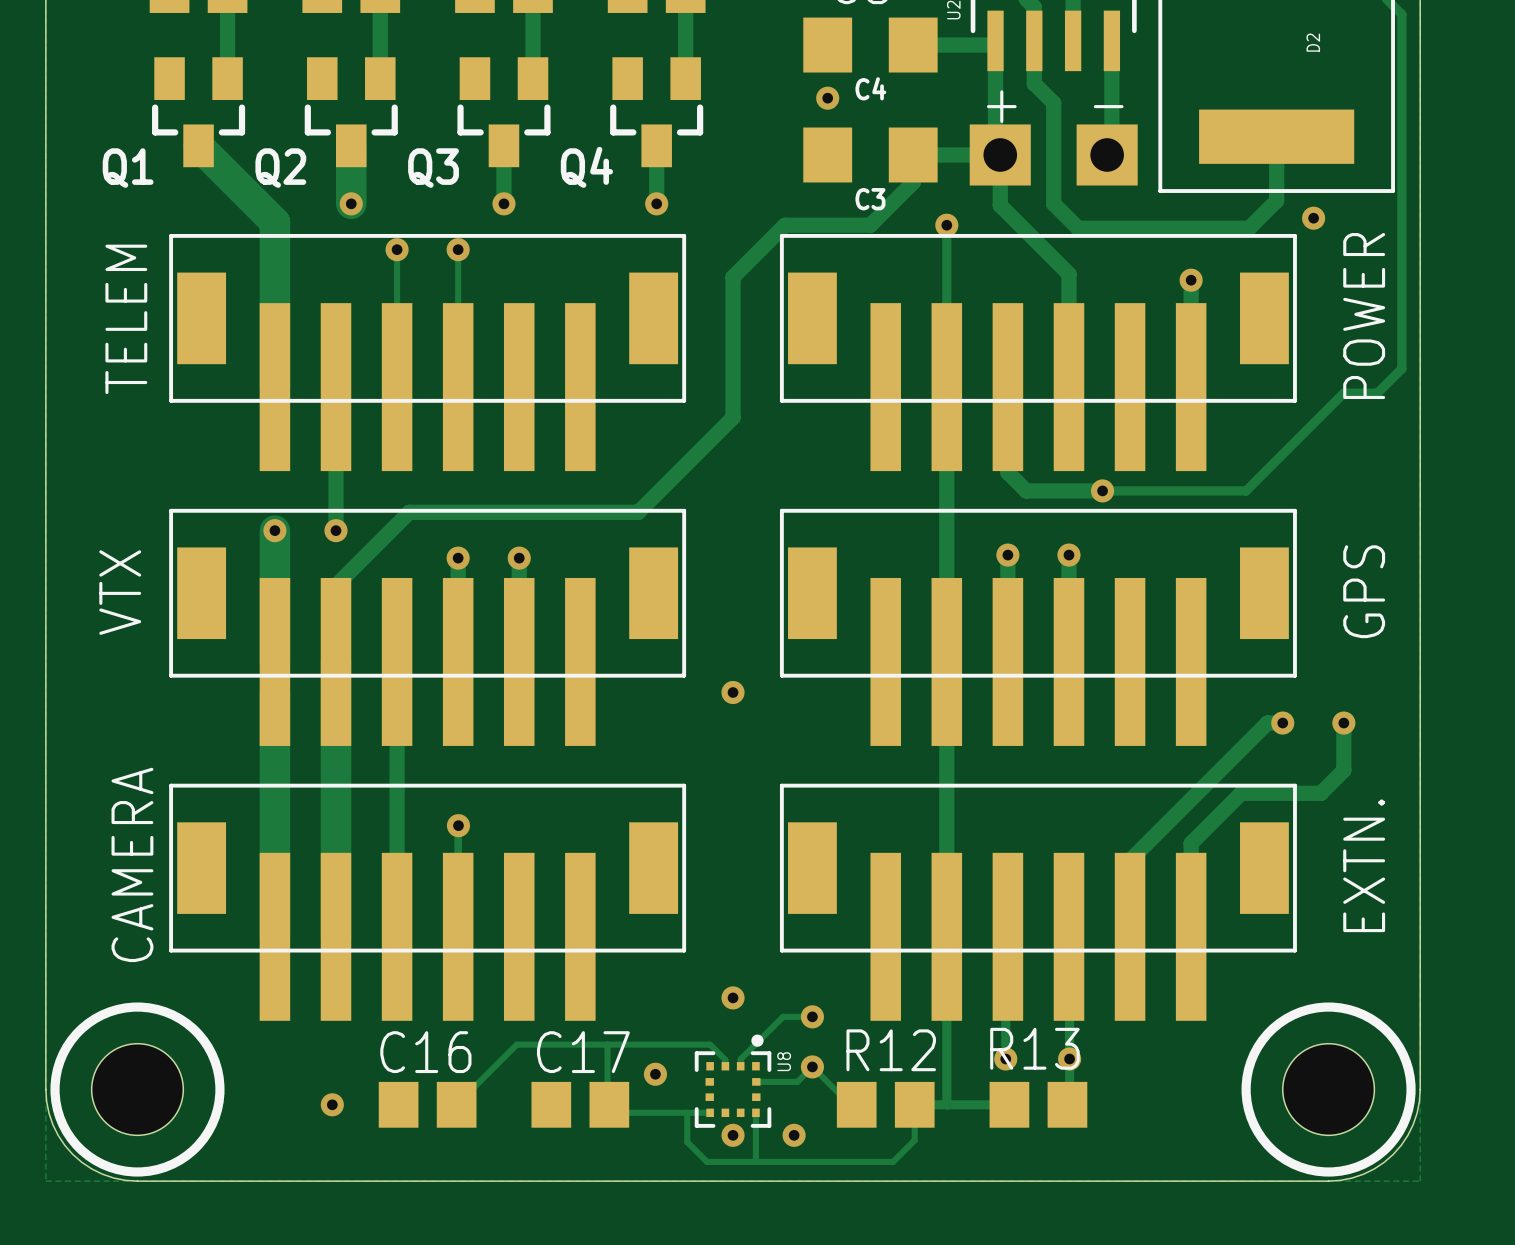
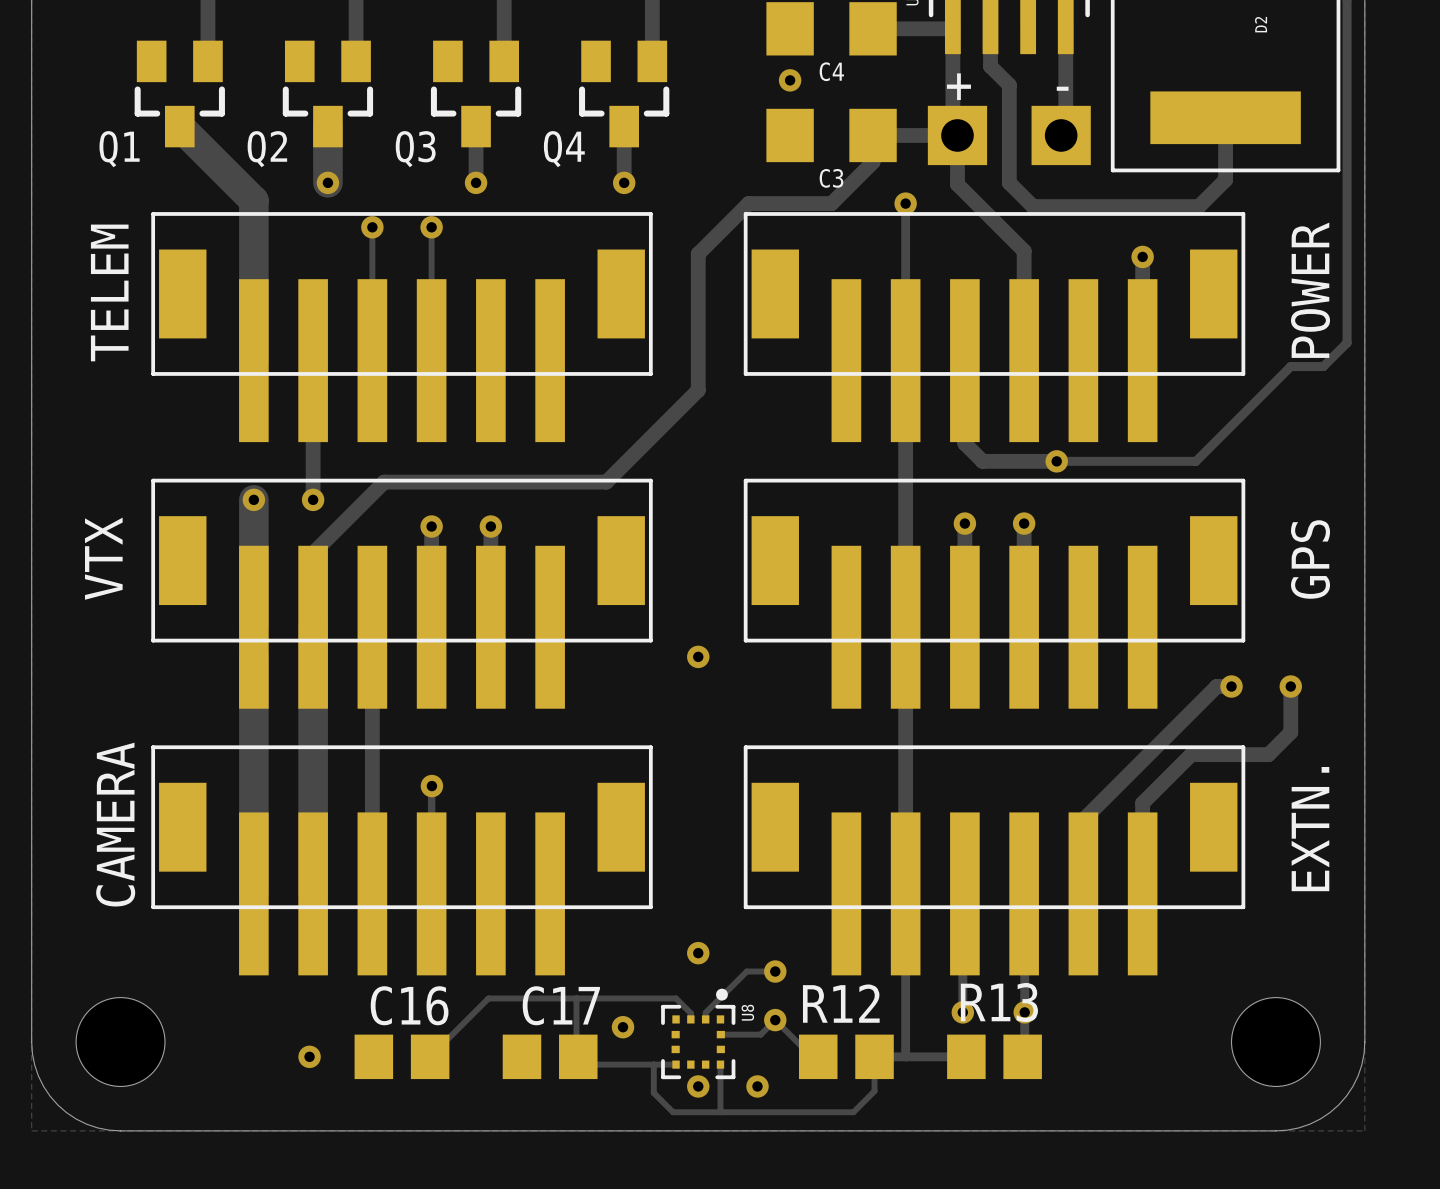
via: (1313, 218) -> none
drawing: [50, 1002, 225, 1177] -> none
drawing: [1241, 1002, 1416, 1177] -> none

